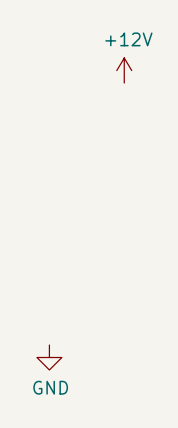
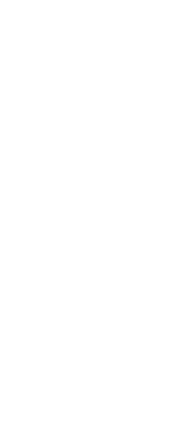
power symbol: +12V (124, 70) -> none
power symbol: GND (49, 357) -> none

